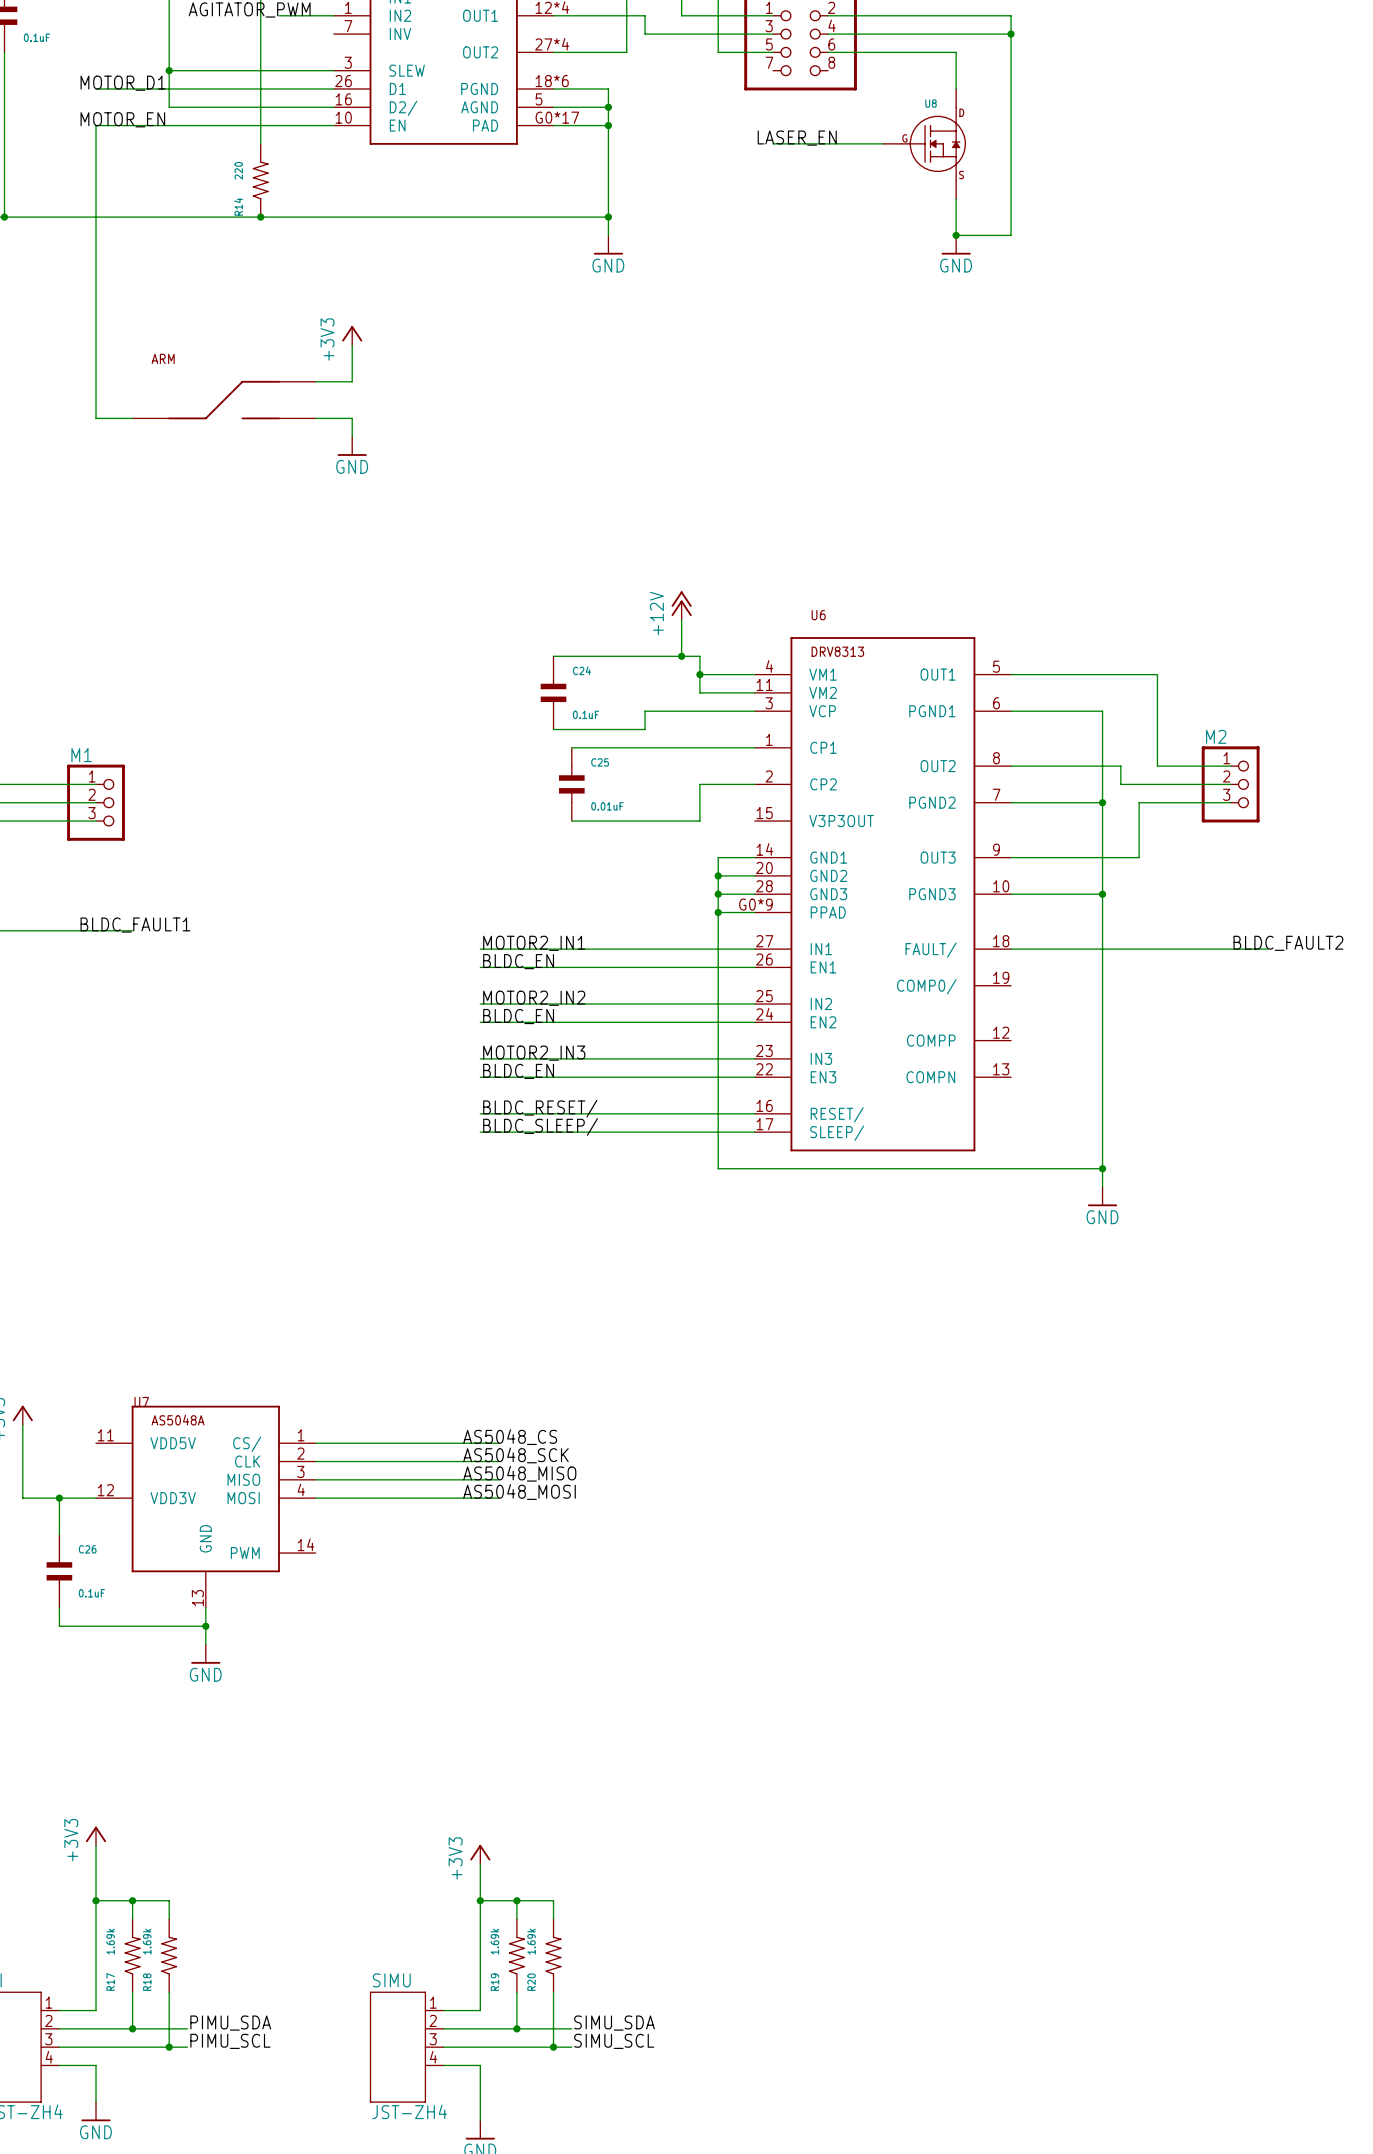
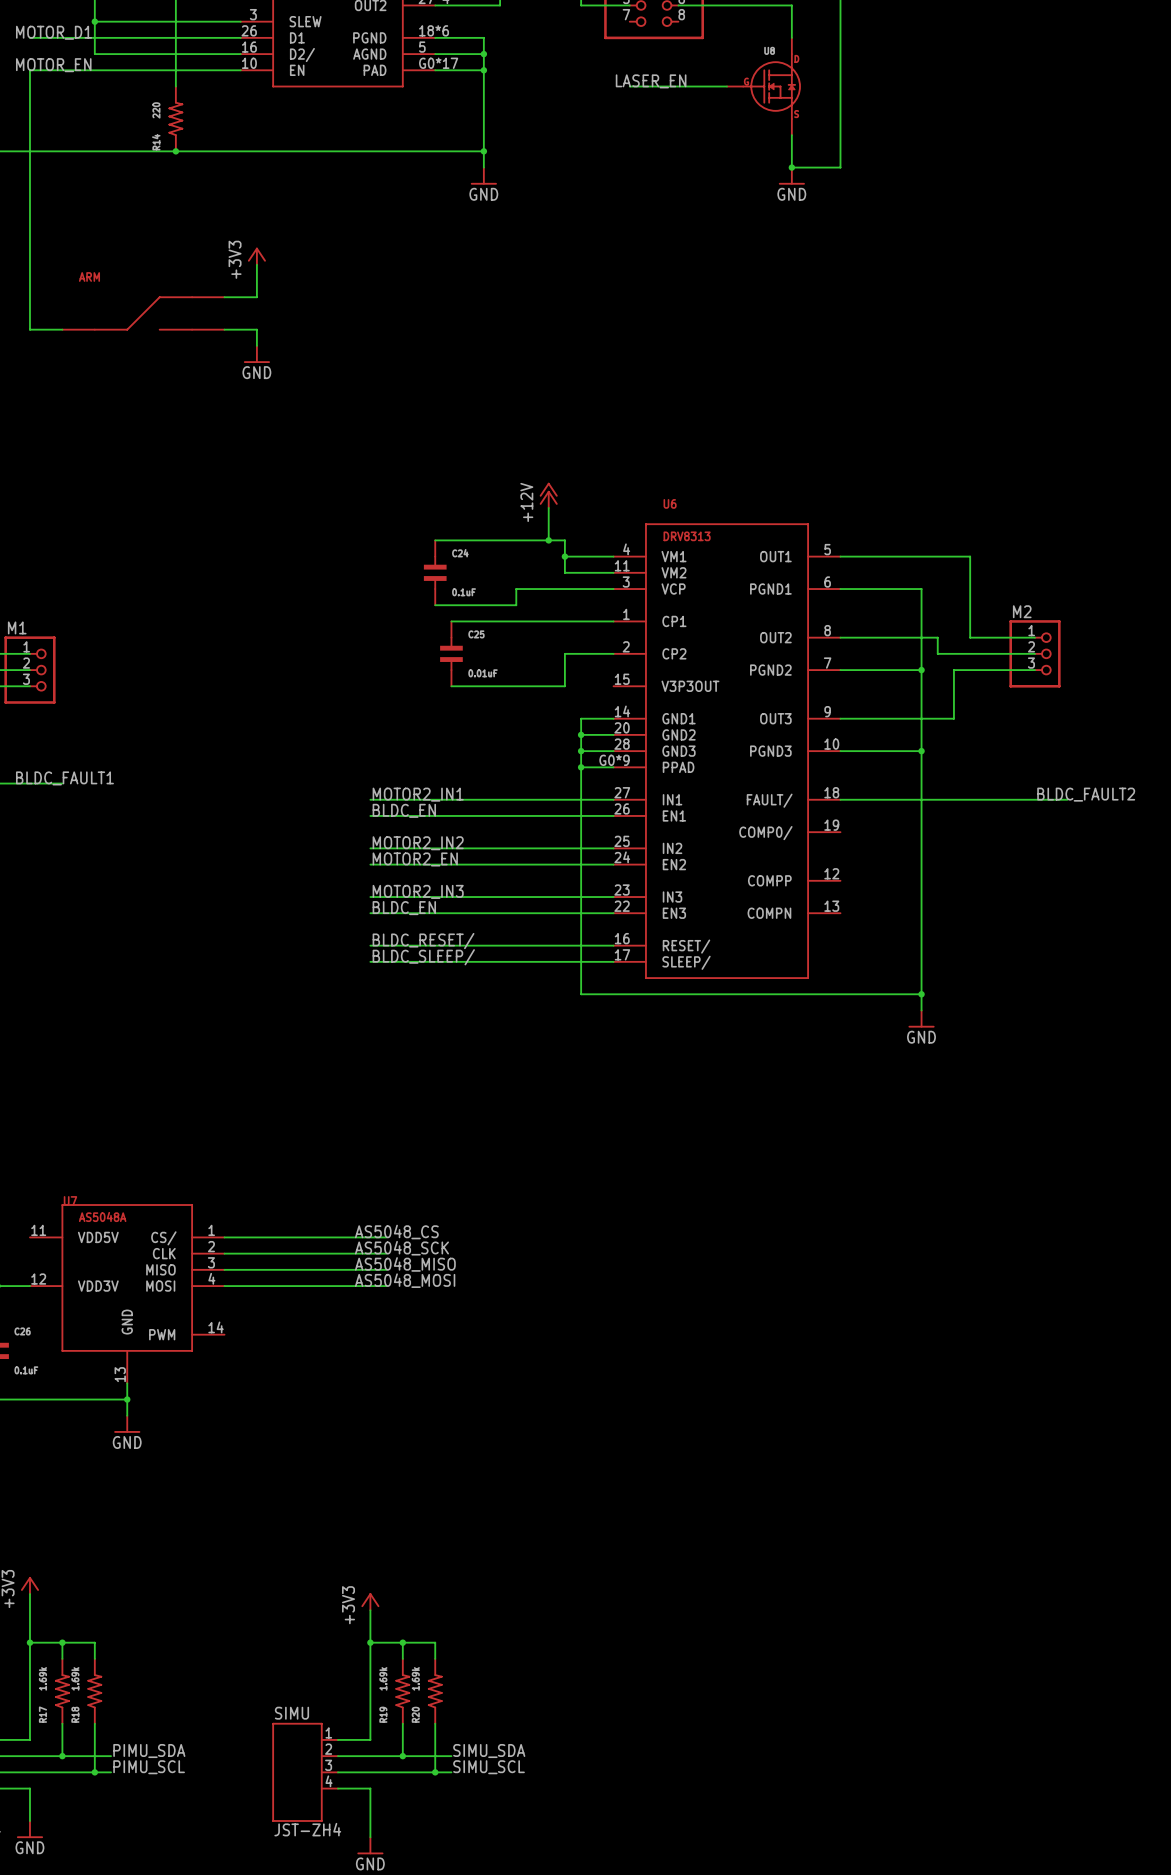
label: BLDC_EN (518, 1016) -> MOTOR2_EN (415, 859)

